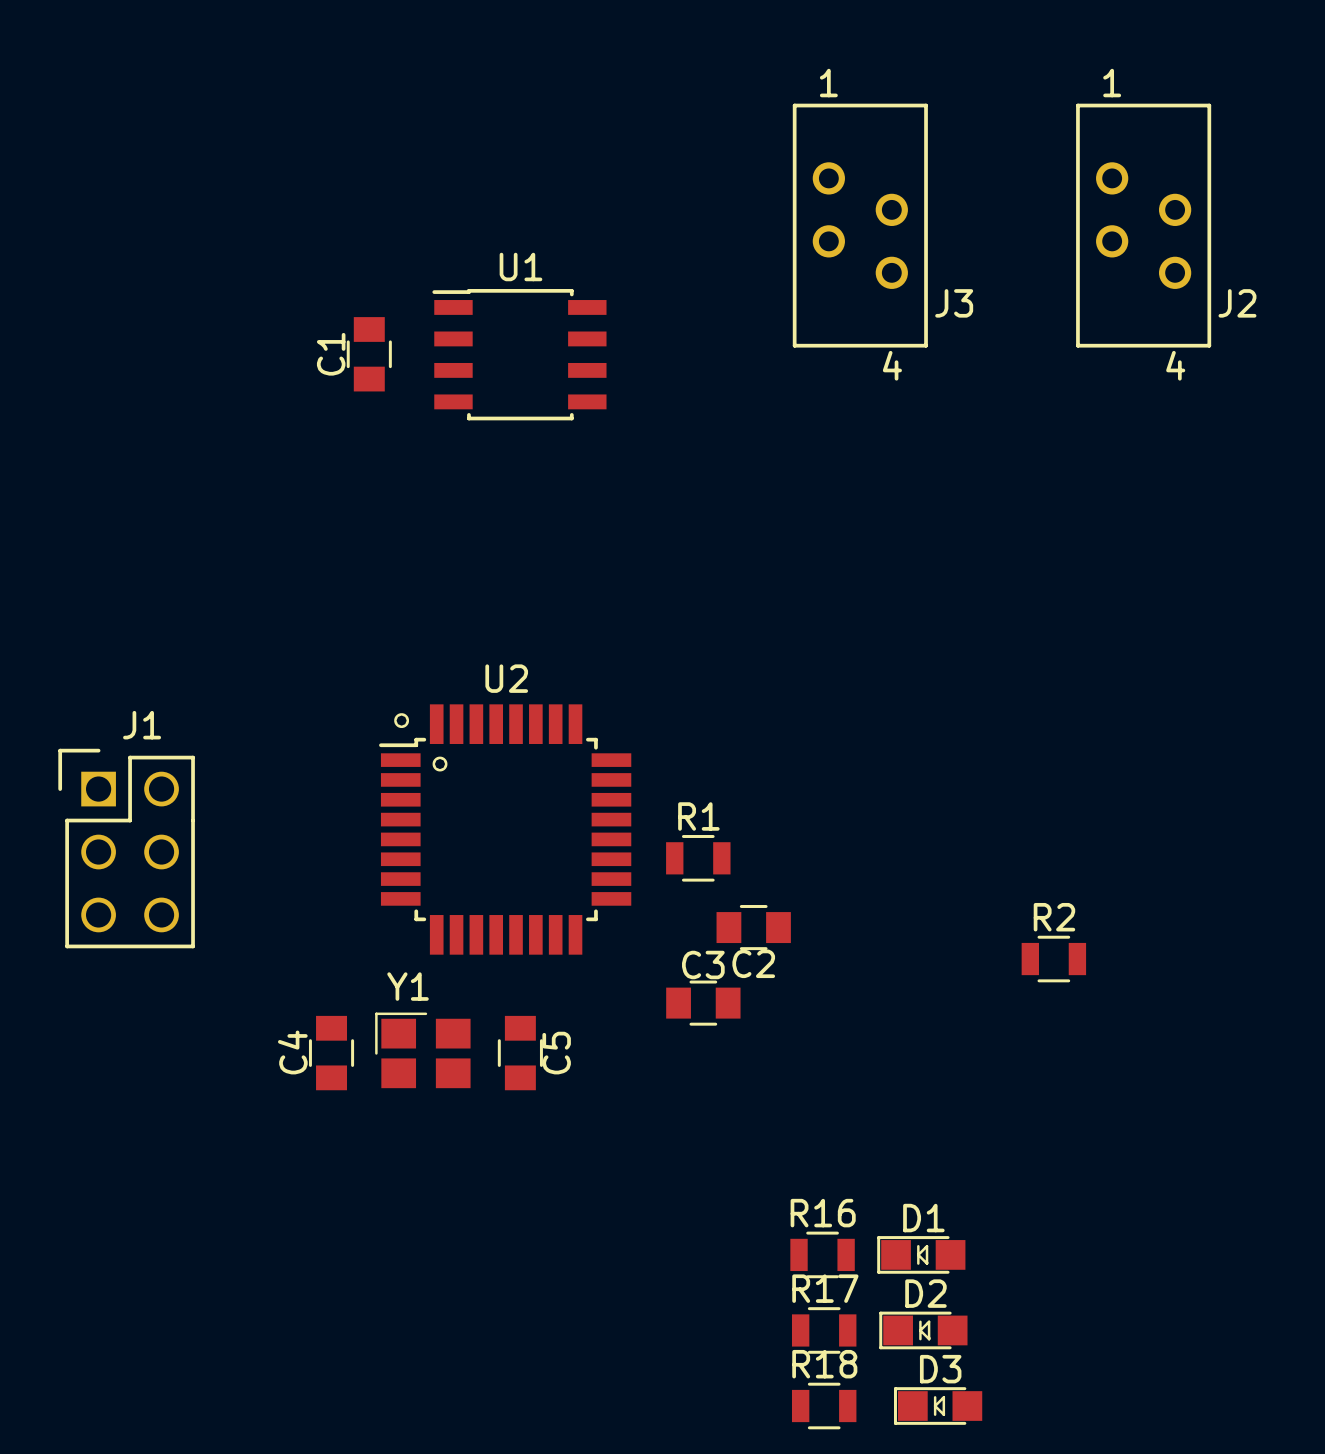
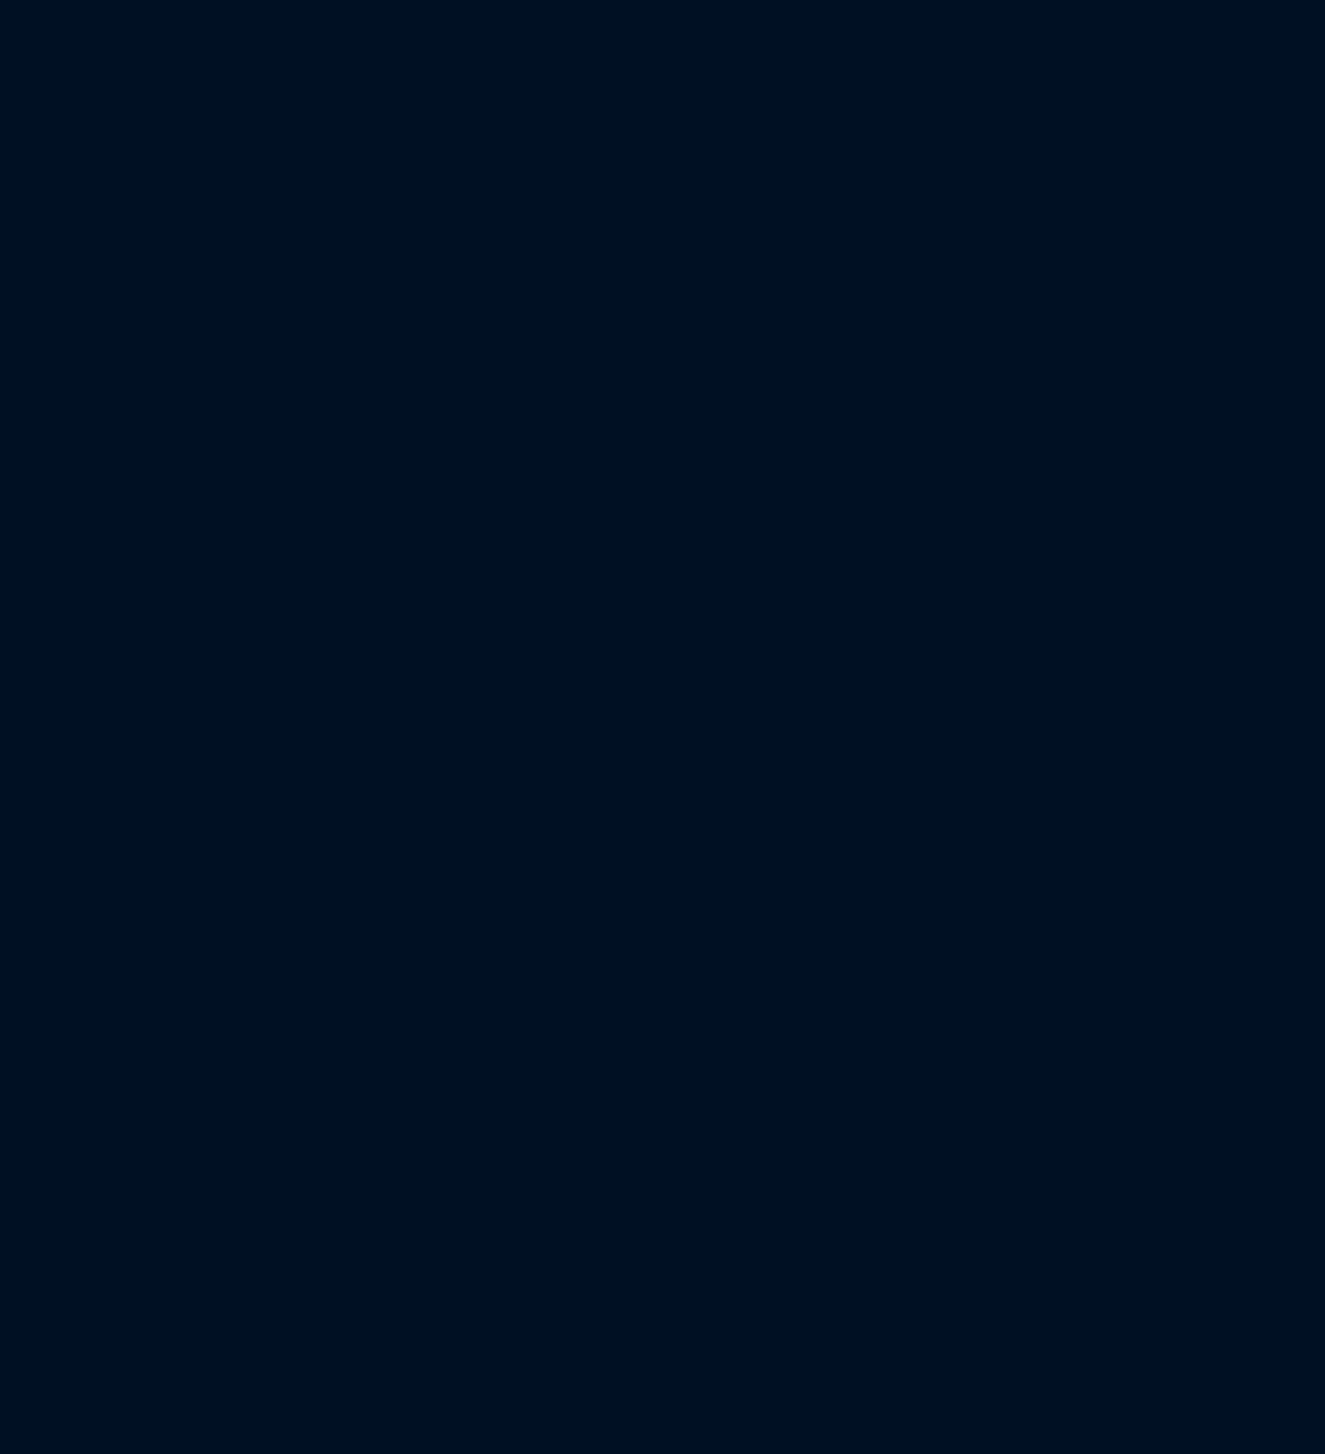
J3: (860, 225) -> none
J2: (1143, 225) -> none
C1: (369, 354) -> none
U1: (519, 354) -> none
U2: (505, 829) -> none
J1: (126, 848) -> none
R1: (698, 858) -> none
C2: (753, 927) -> none
R2: (1053, 959) -> none
C3: (703, 1003) -> none
Y1: (422, 1050) -> none
C4: (331, 1053) -> none
C5: (520, 1053) -> none
R16: (822, 1254) -> none
D1: (921, 1254) -> none
R17: (824, 1330) -> none
D2: (923, 1330) -> none
R18: (824, 1406) -> none
D3: (938, 1406) -> none

